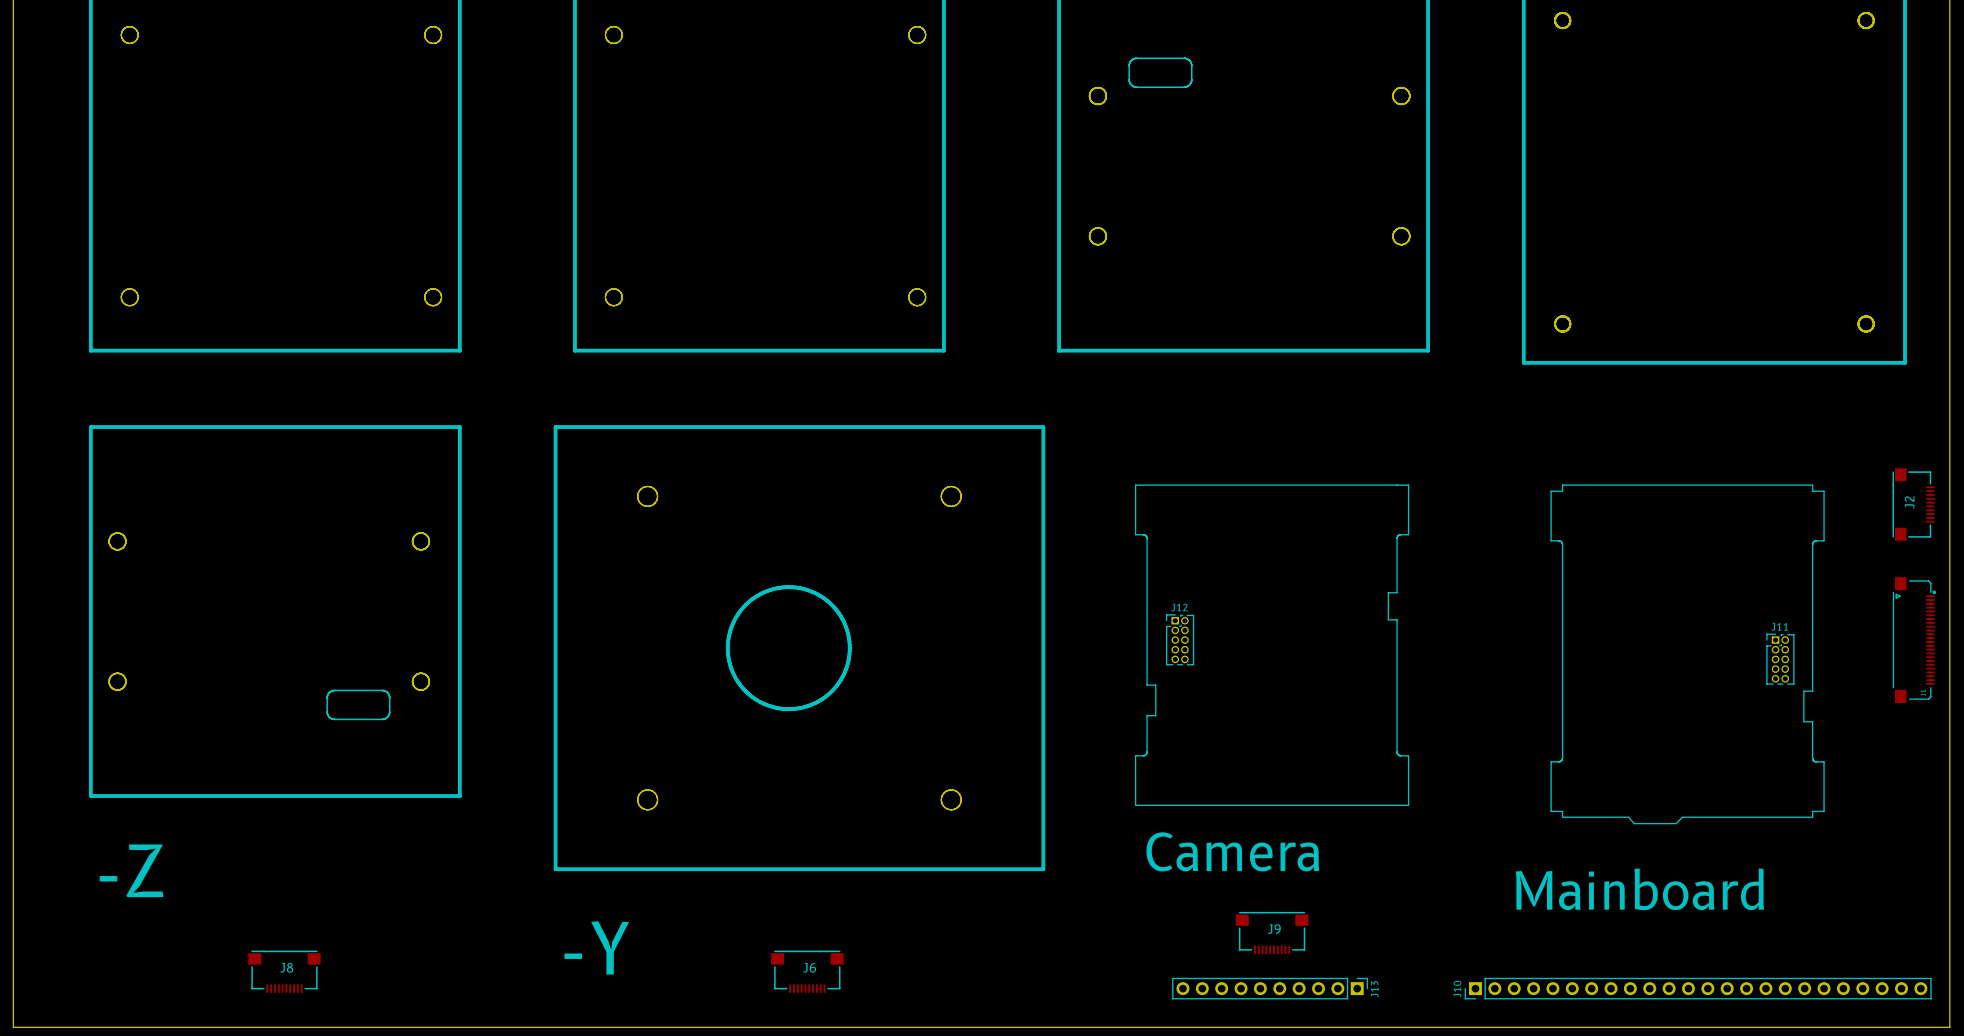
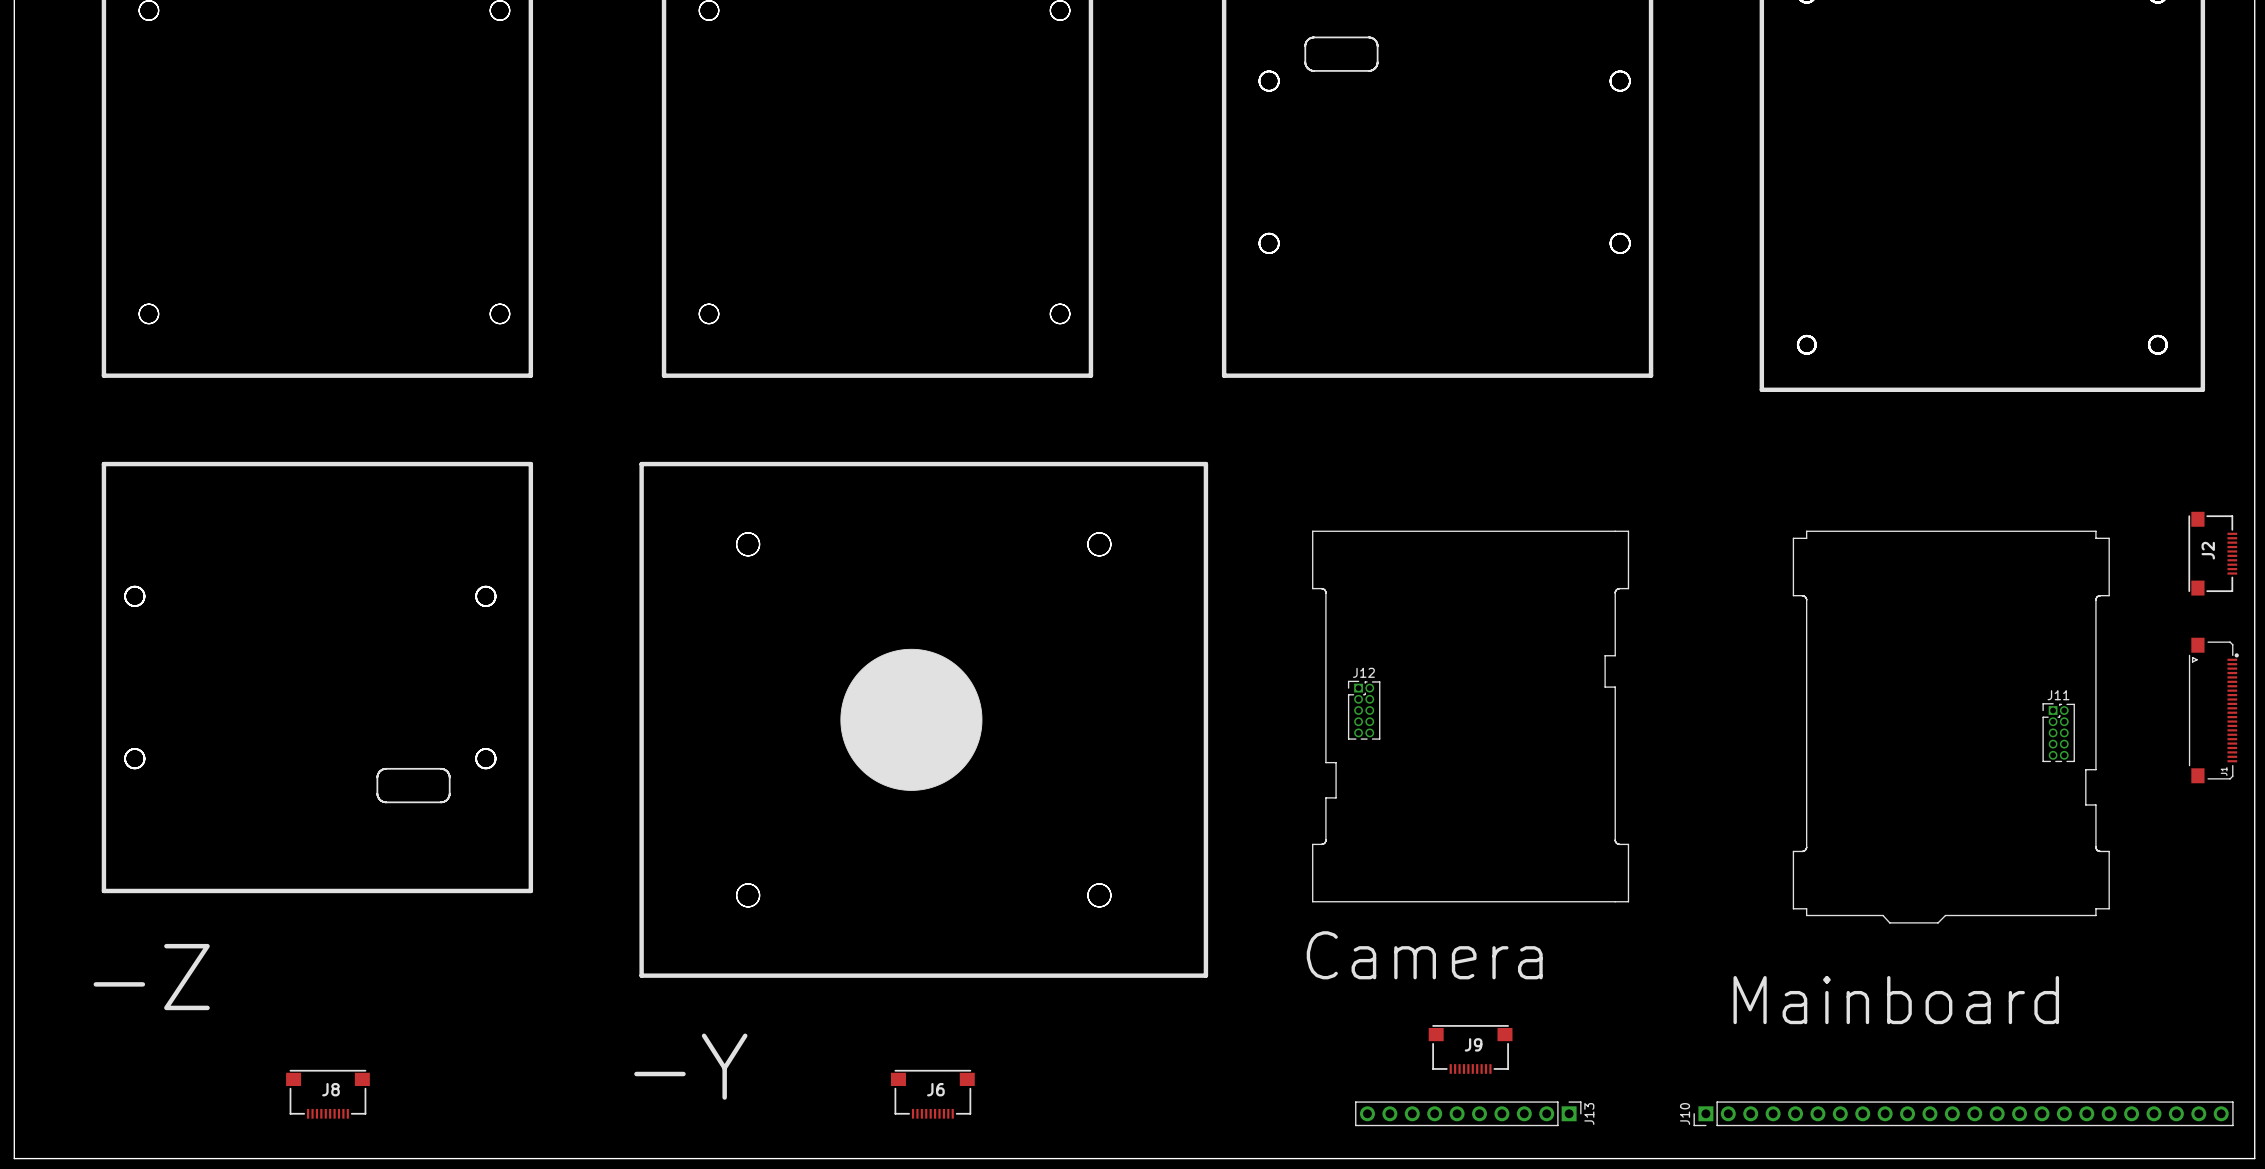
drawing: none -> [840, 648, 983, 791]
line: (788, 587) (765, 591) (745, 605) (732, 624) (727, 648) (732, 671) (745, 691) (765, 704) (788, 709) (812, 704) (831, 691) (844, 671) (849, 648) (844, 624) (831, 605) (812, 591) (788, 587) -> none

